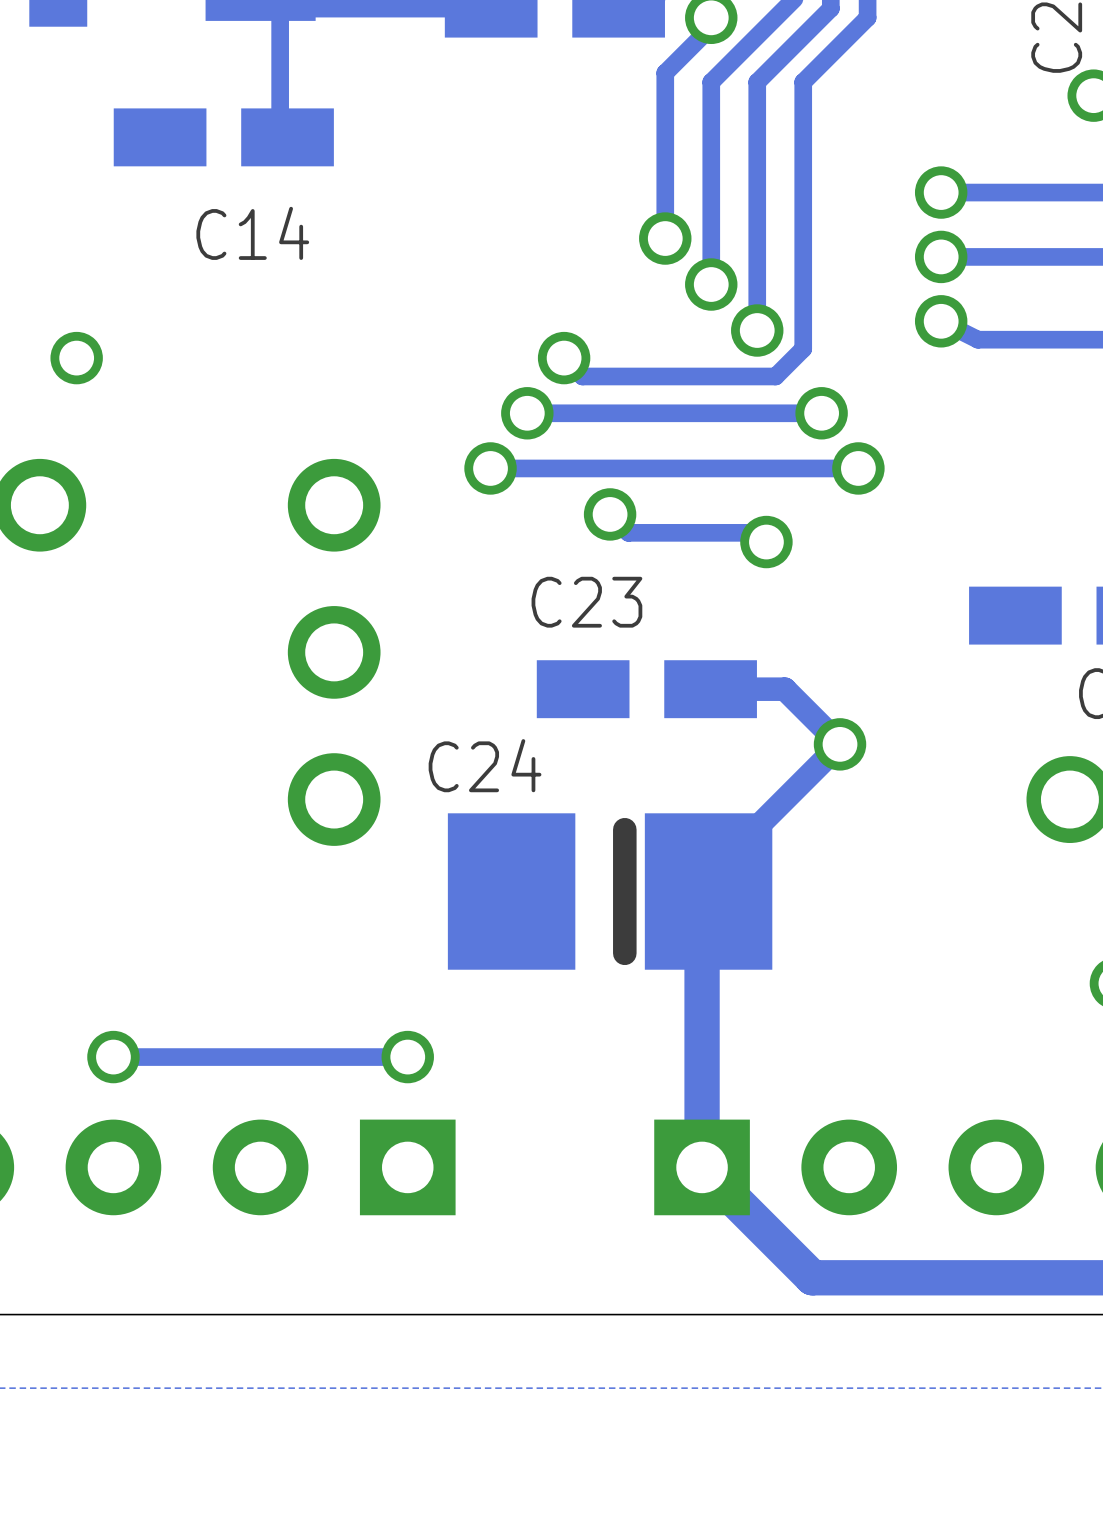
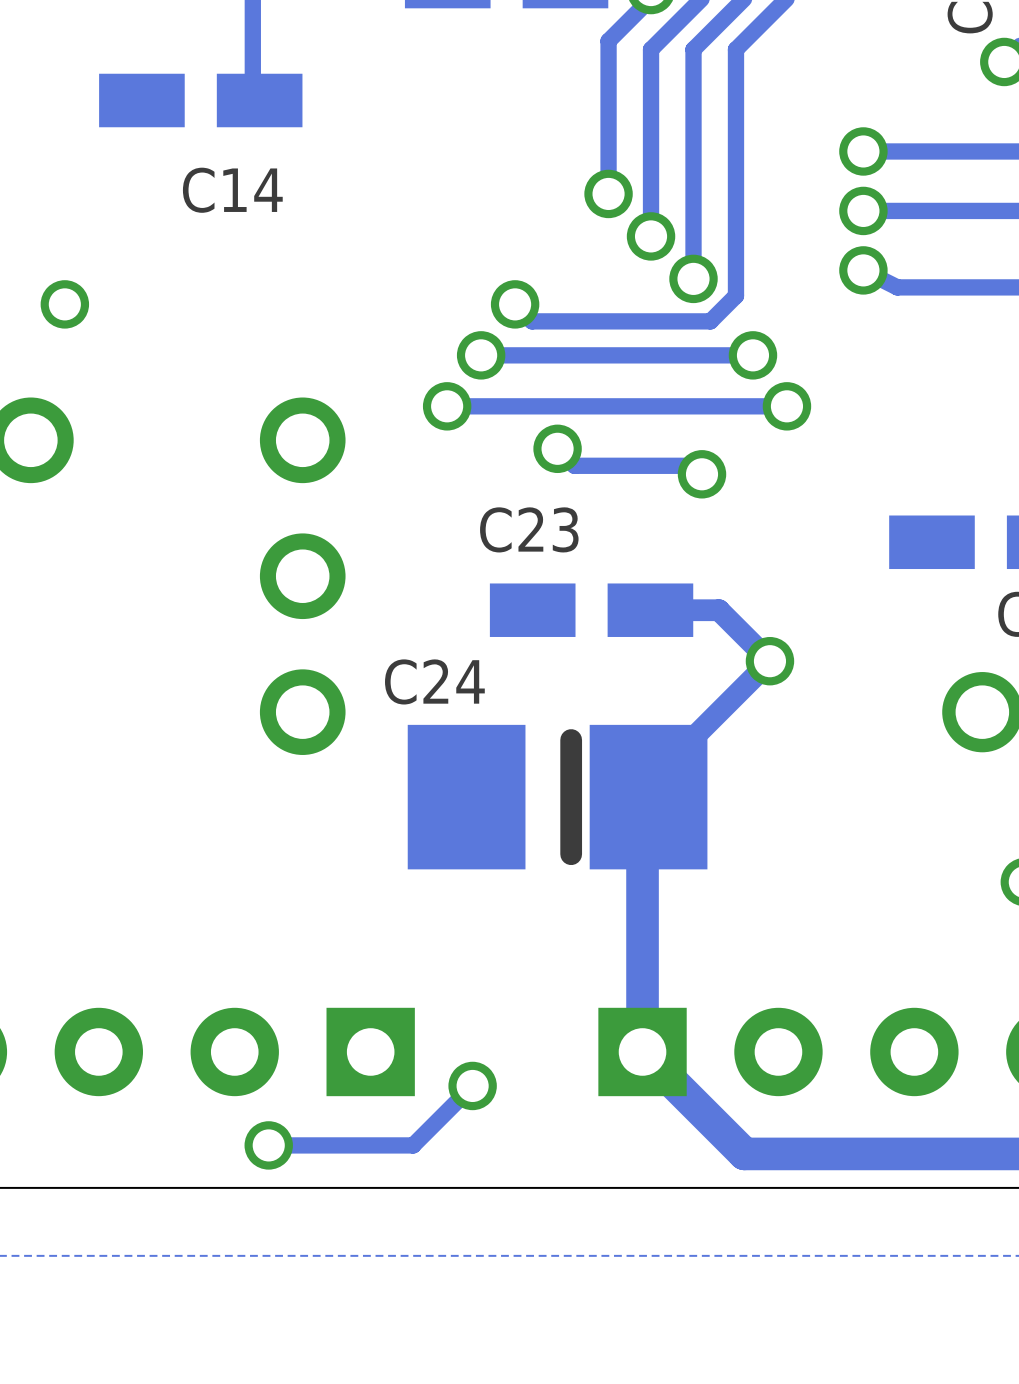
via: (113, 1057) -> none
track: (407, 1057) (113, 1057) -> none
via: (407, 1057) -> none
track: none -> (472, 1085) (413, 1145) (268, 1145)
via: none -> (472, 1085)
via: none -> (268, 1145)

